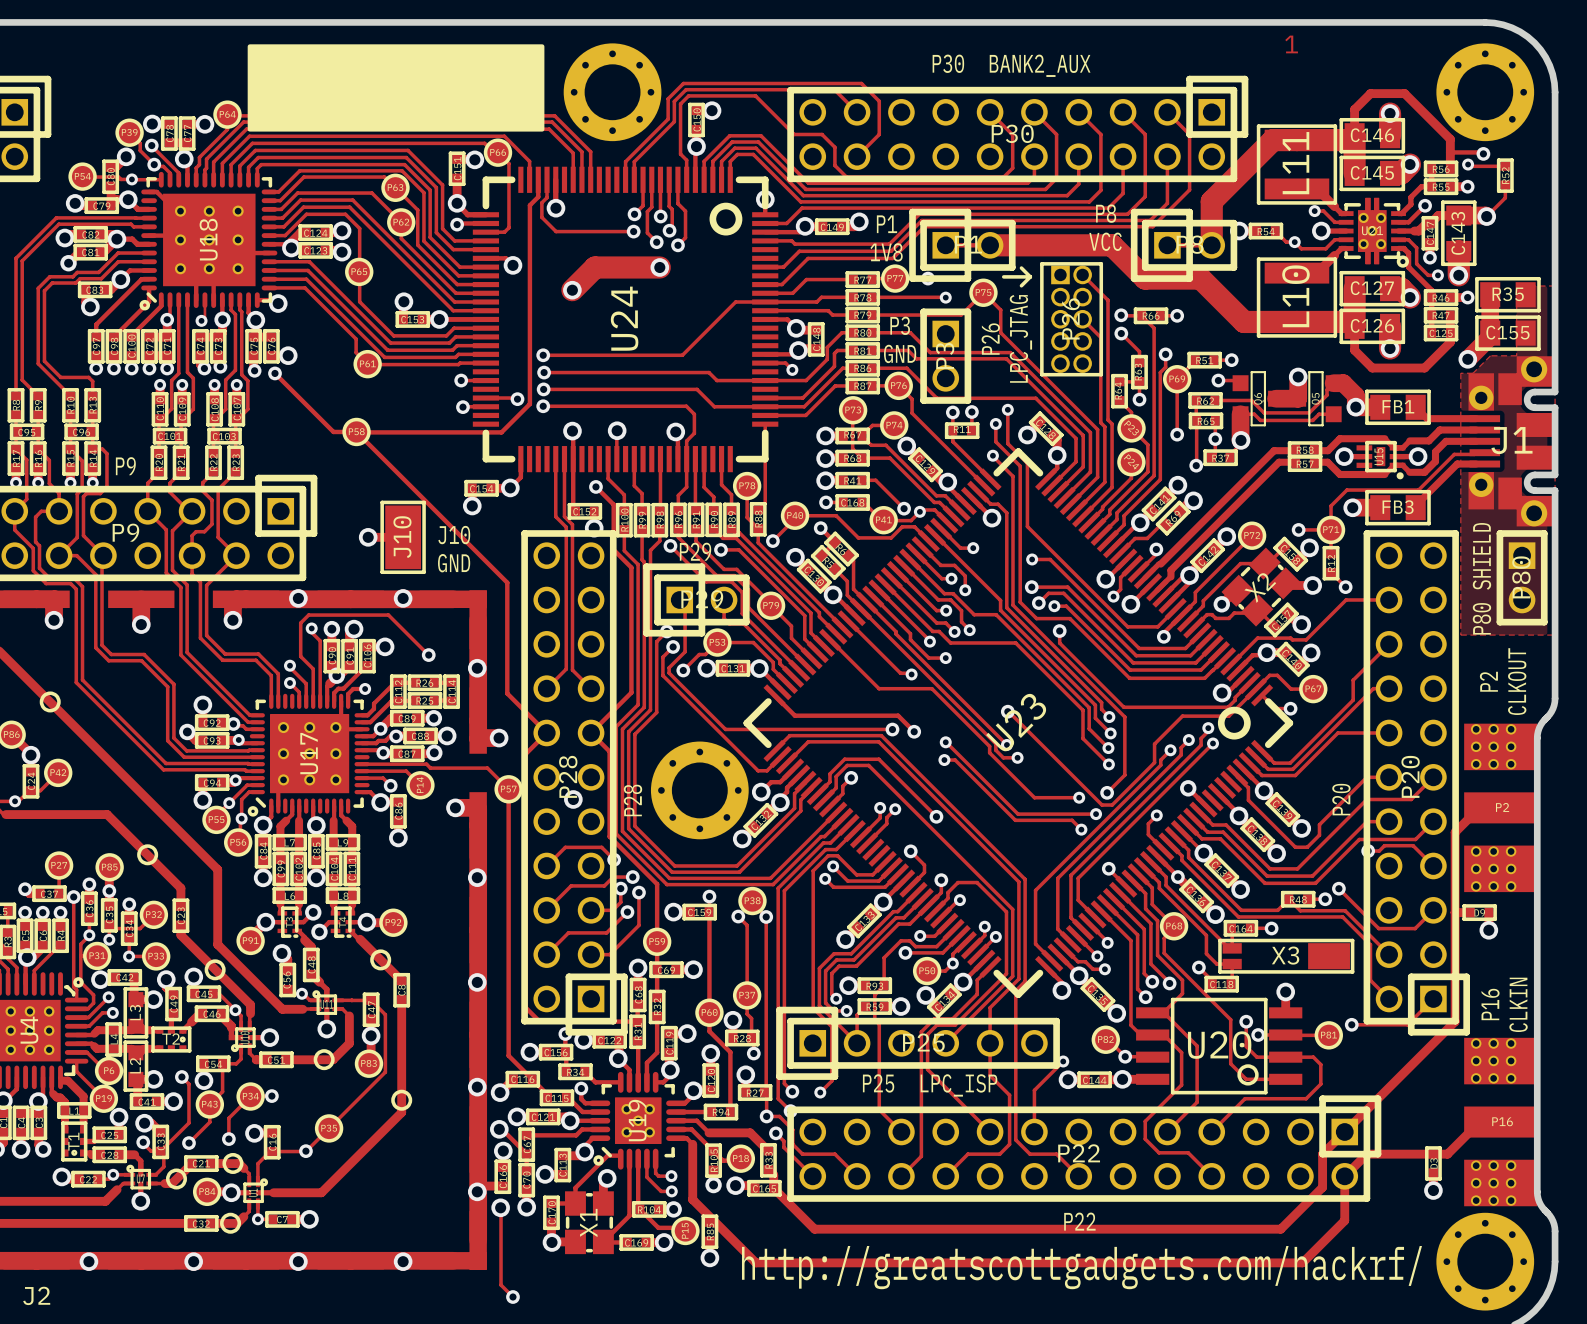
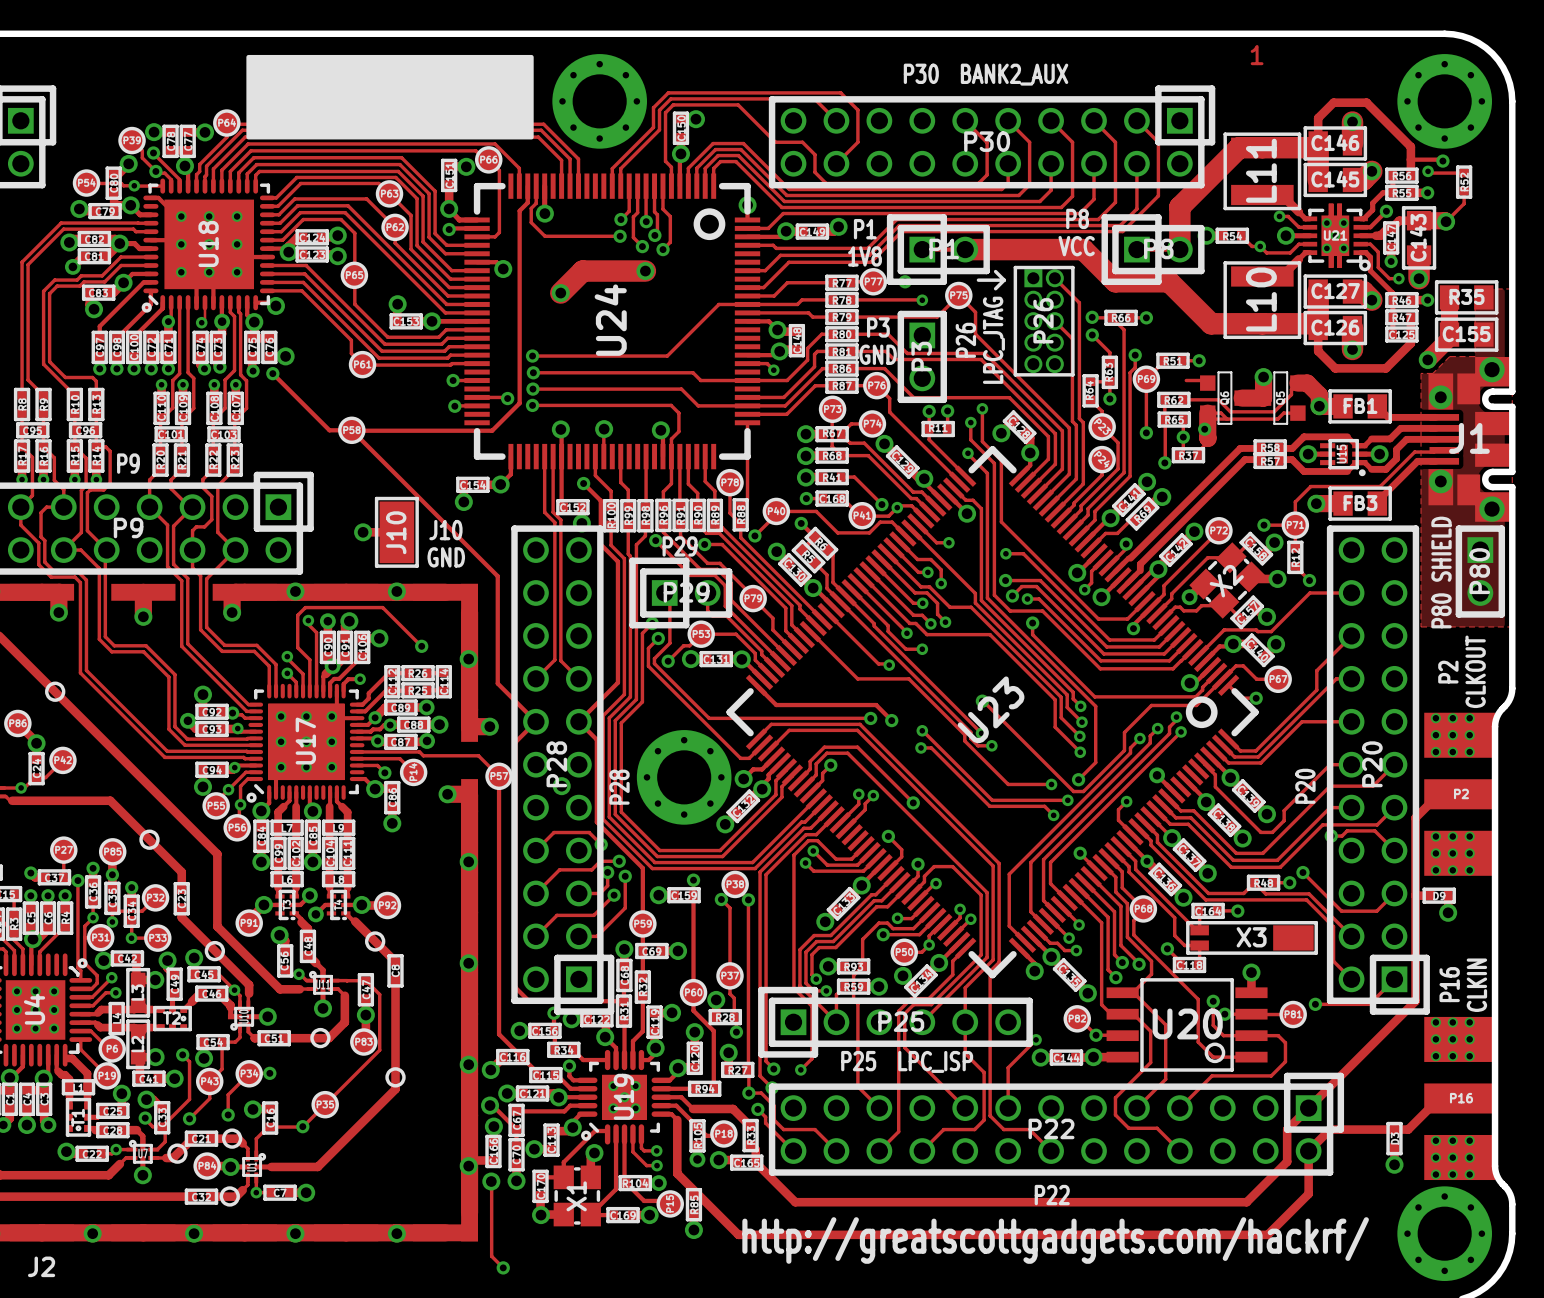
via position: (1218, 380) -> (1204, 429)
via: (1241, 440) -> none

